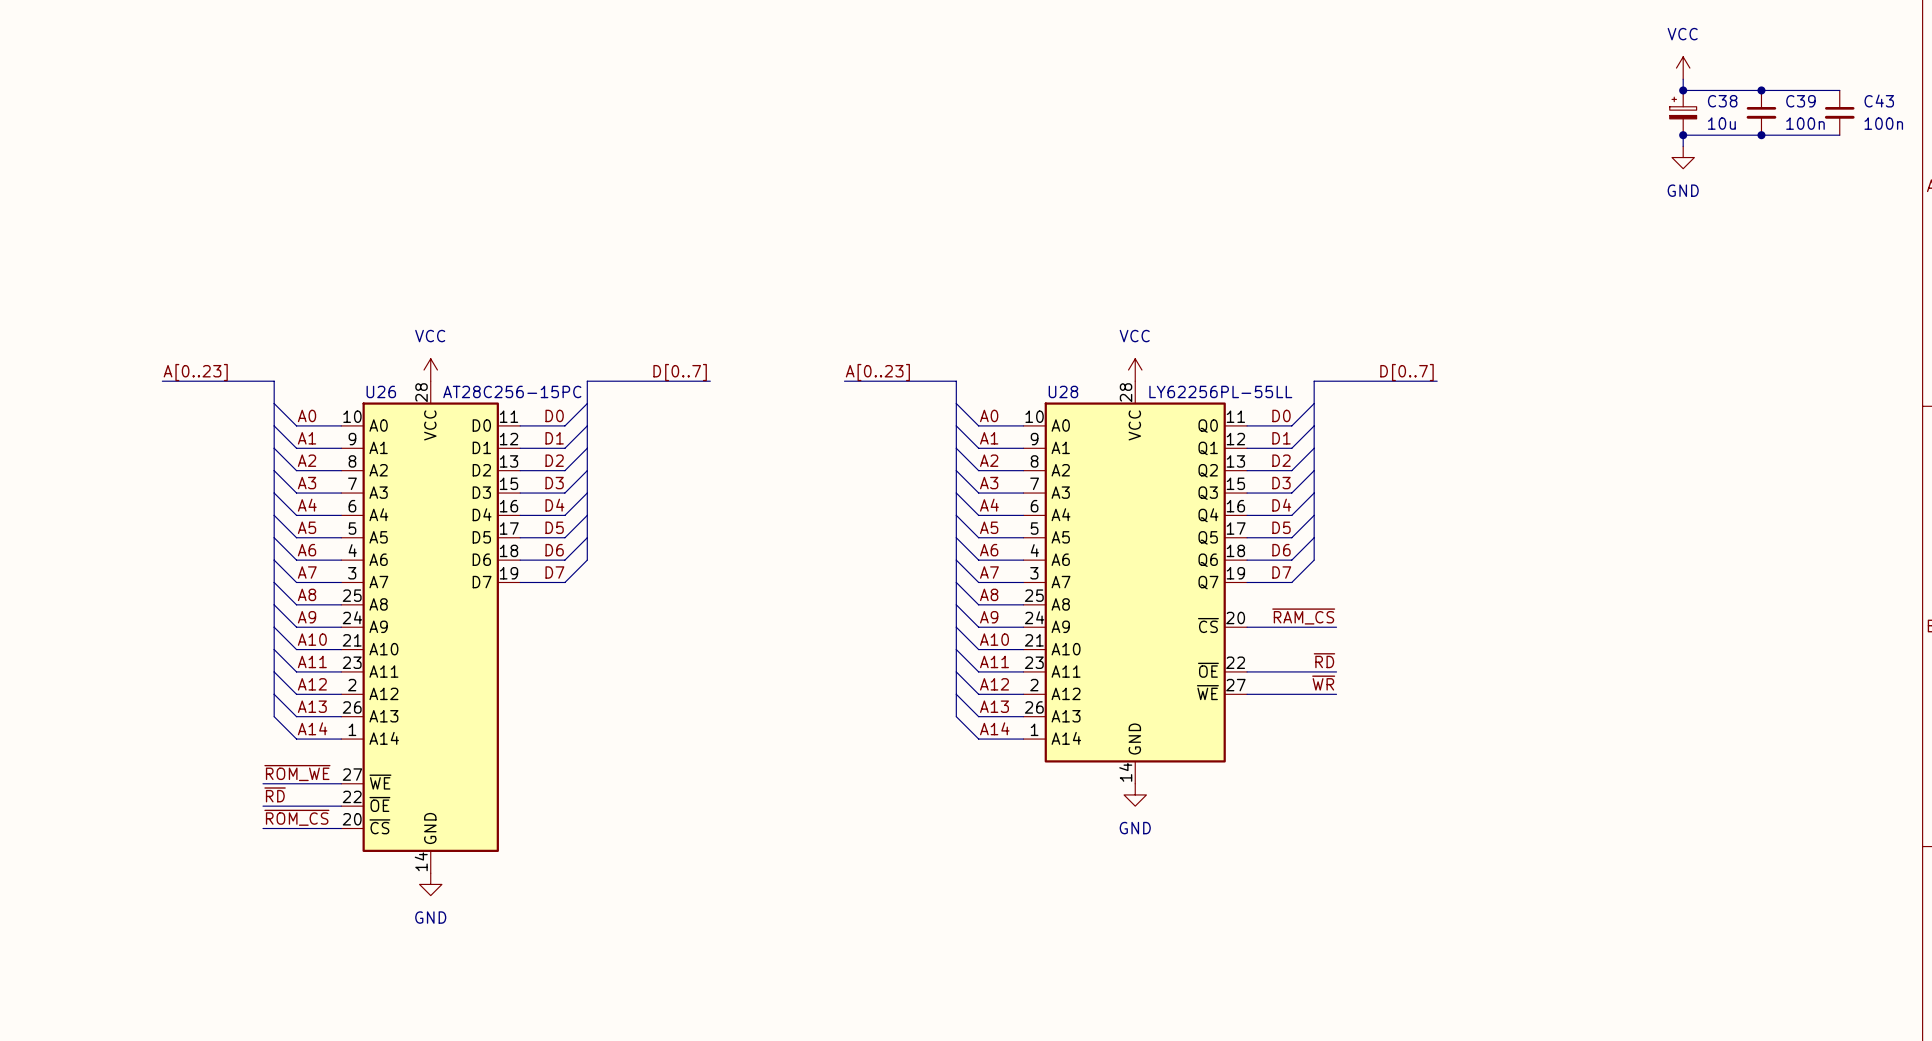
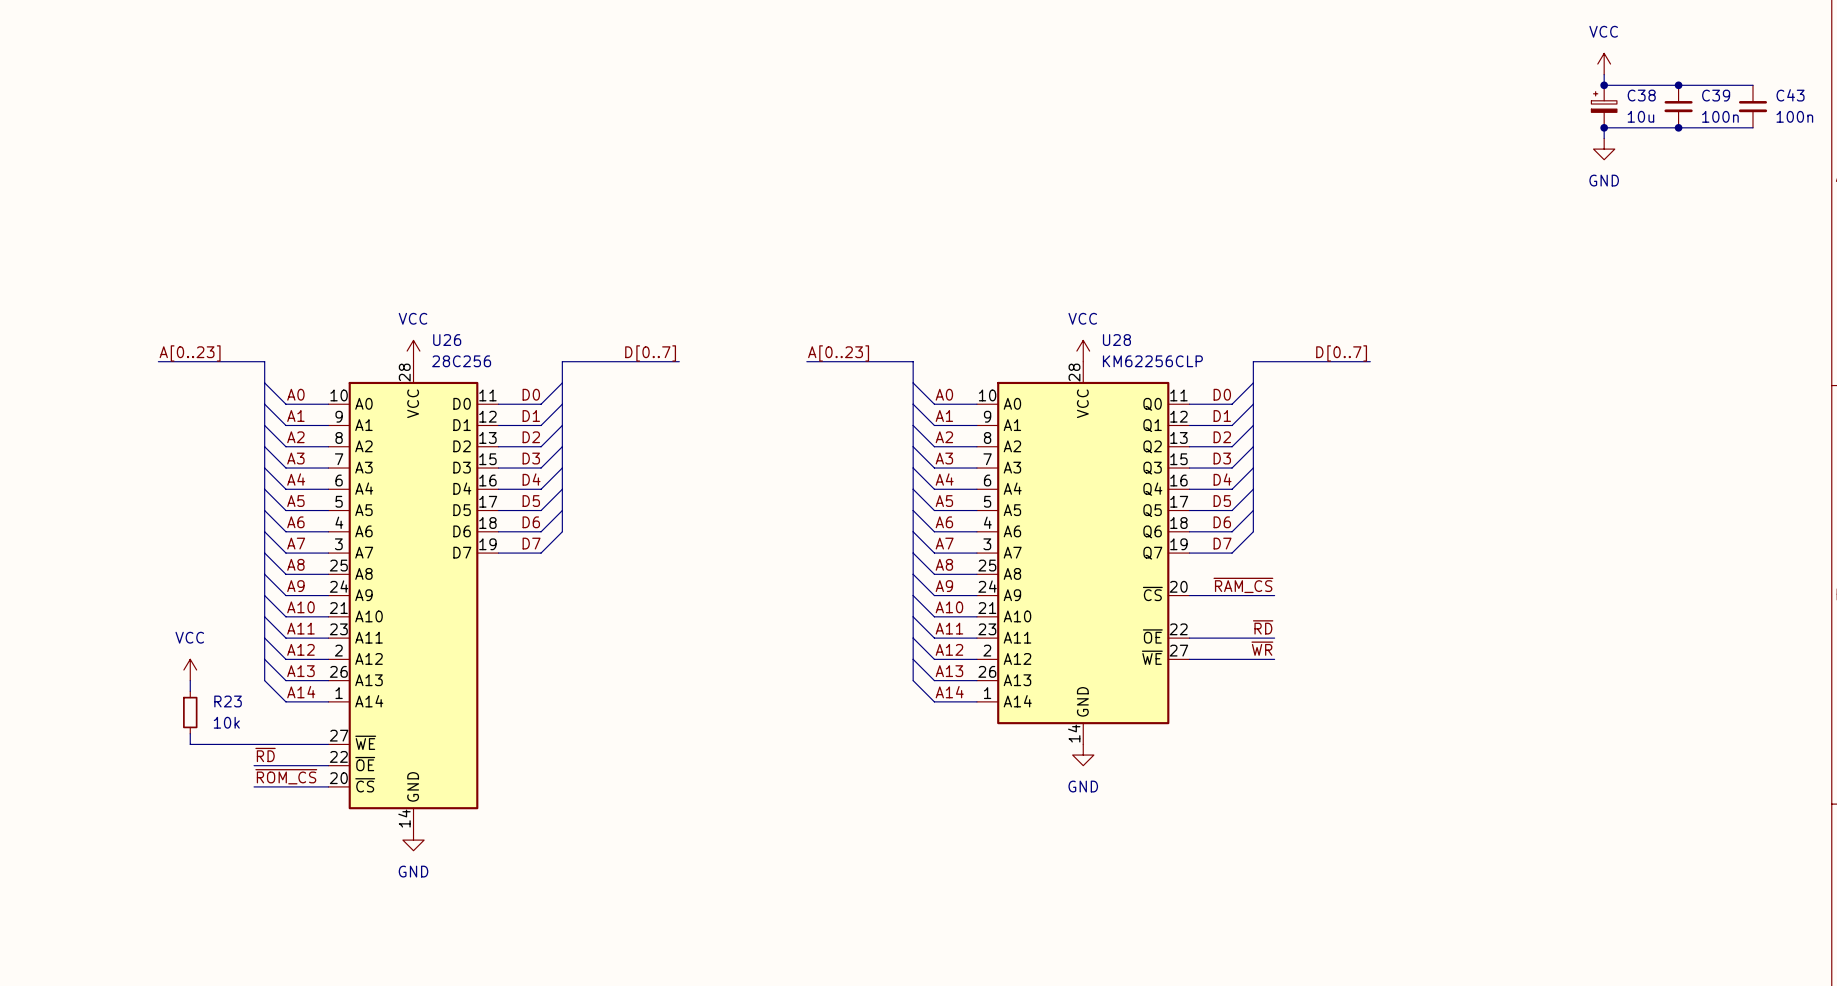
U26 name position: U26 (381, 391) -> U26 (447, 340)
U26 value: AT28C256-15PC (512, 391) -> 28C256 (461, 361)
U28 name position: U28 (1063, 391) -> U28 (1116, 340)
U28 value: LY62256PL-55LL (1220, 391) -> KM62256CLP (1152, 361)
power symbol: none -> VCC (190, 670)
wire: none -> (190, 680) (190, 691)
R23: none -> 10k (190, 712)
wire: none -> (190, 733) (190, 744) (254, 744)
label: ~{ROM_WE} (297, 773) -> none

